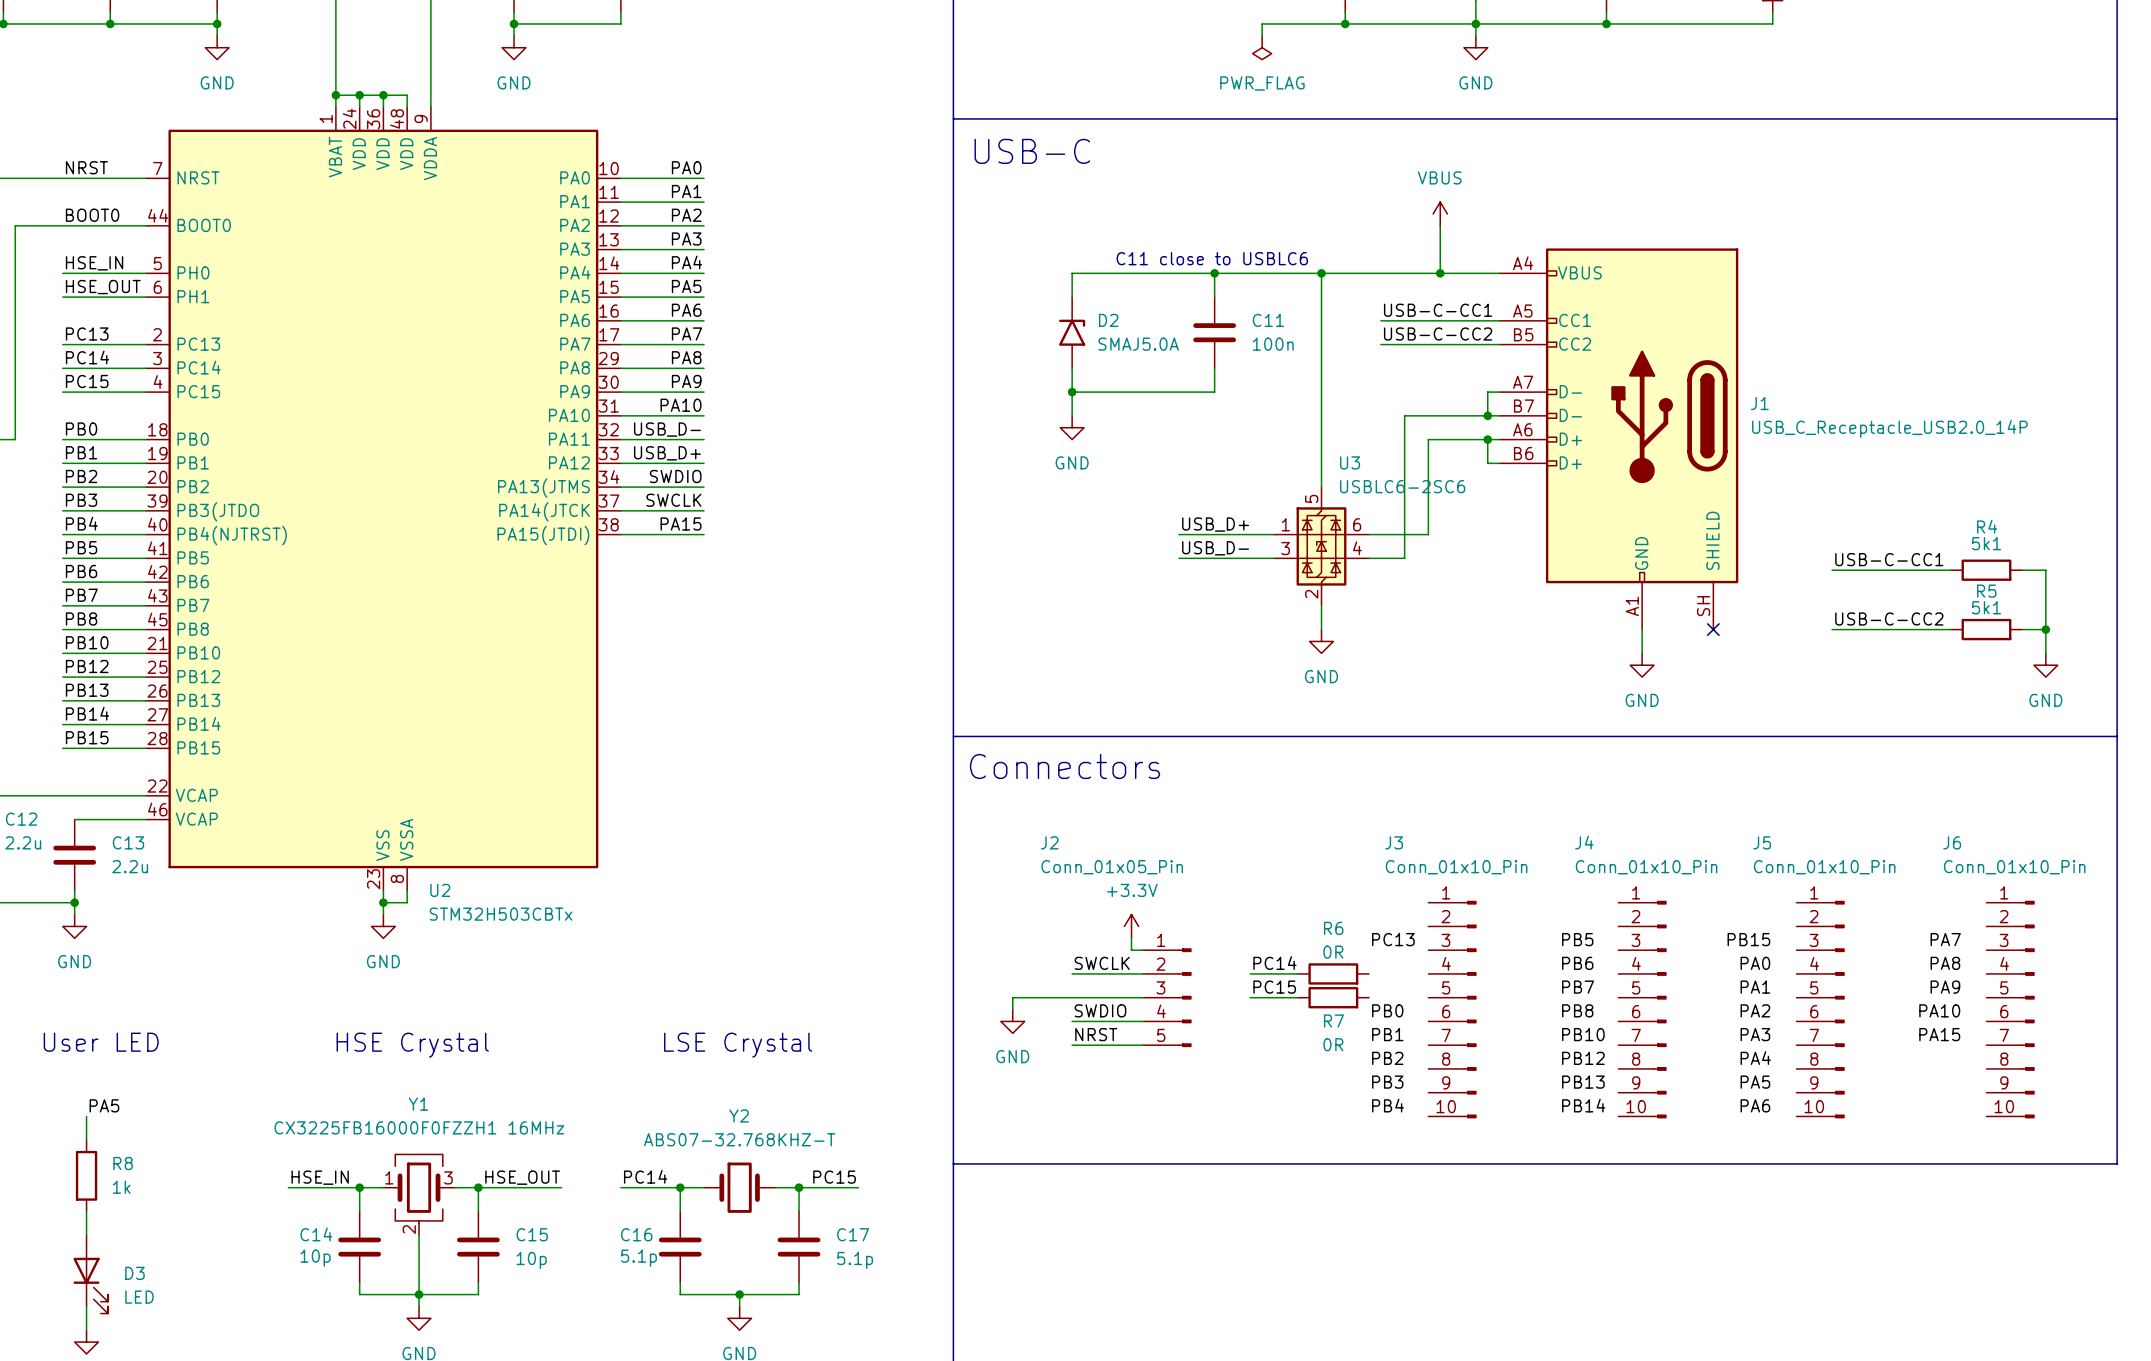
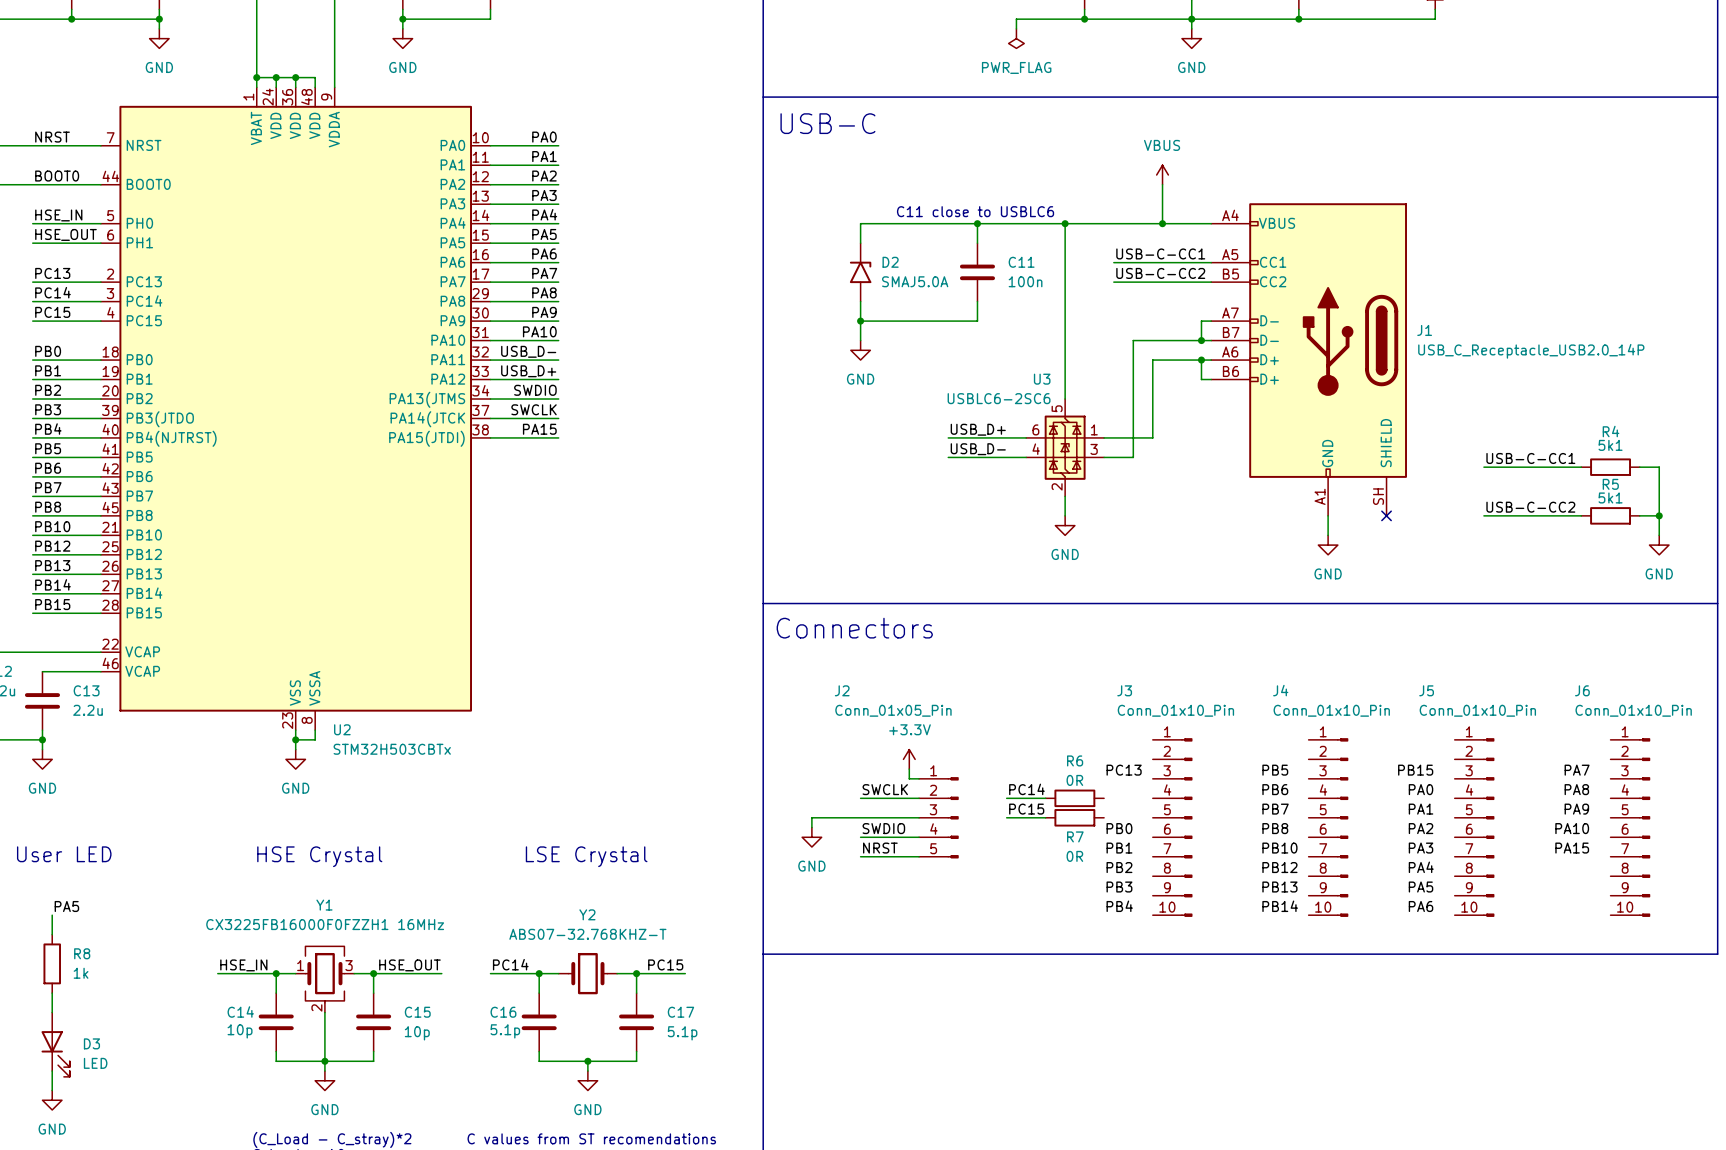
U3 flip: as is (1321, 546) -> left-right (1065, 447)

